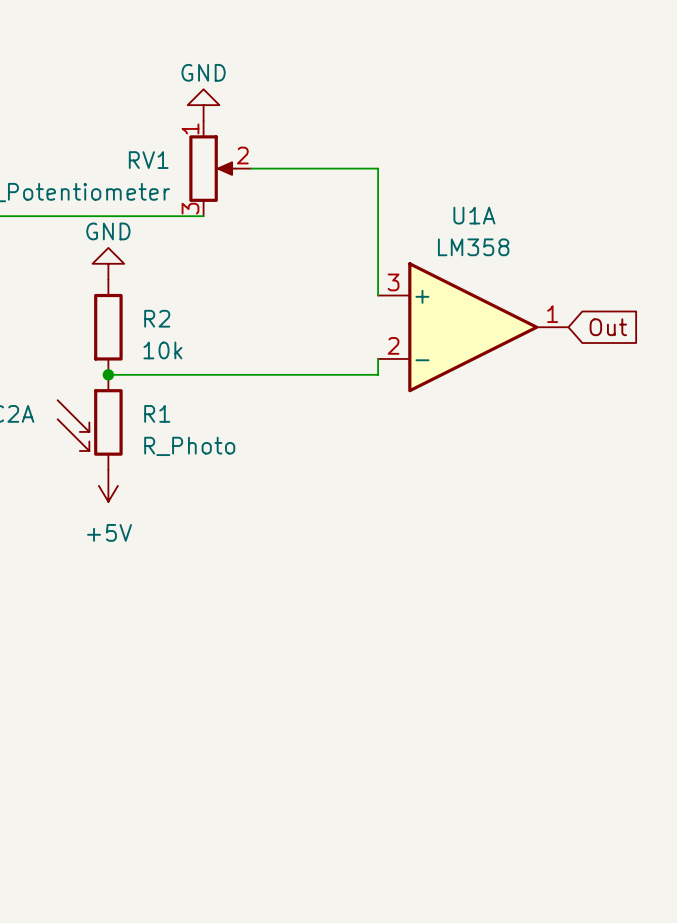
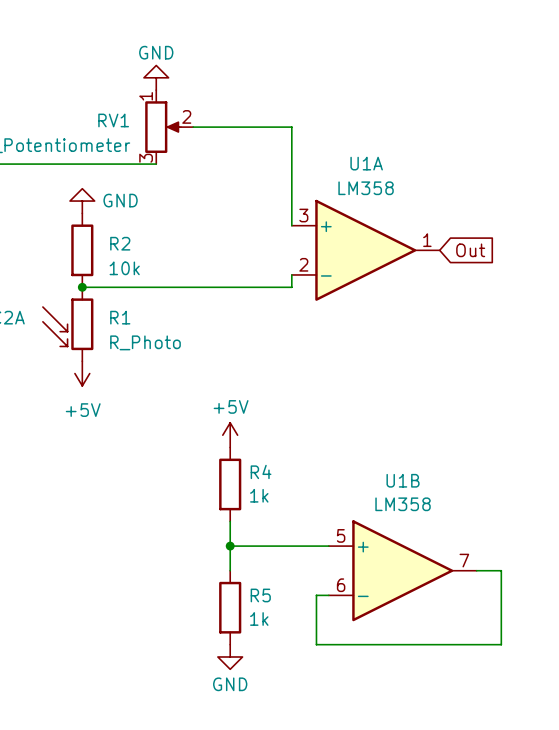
power symbol text position: GND (108, 231) -> GND (120, 200)
power symbol: none -> +5V (230, 435)
R4: none -> 1k (230, 484)
wire: none -> (230, 521) (230, 570)
wire: none -> (230, 546) (328, 546)
junction: none -> (230, 546)
U1B: none -> LM358 (402, 570)
wire: none -> (476, 570) (501, 570) (501, 644) (316, 644) (316, 595) (328, 595)
R5: none -> 1k (230, 607)
power symbol: none -> GND (230, 656)

